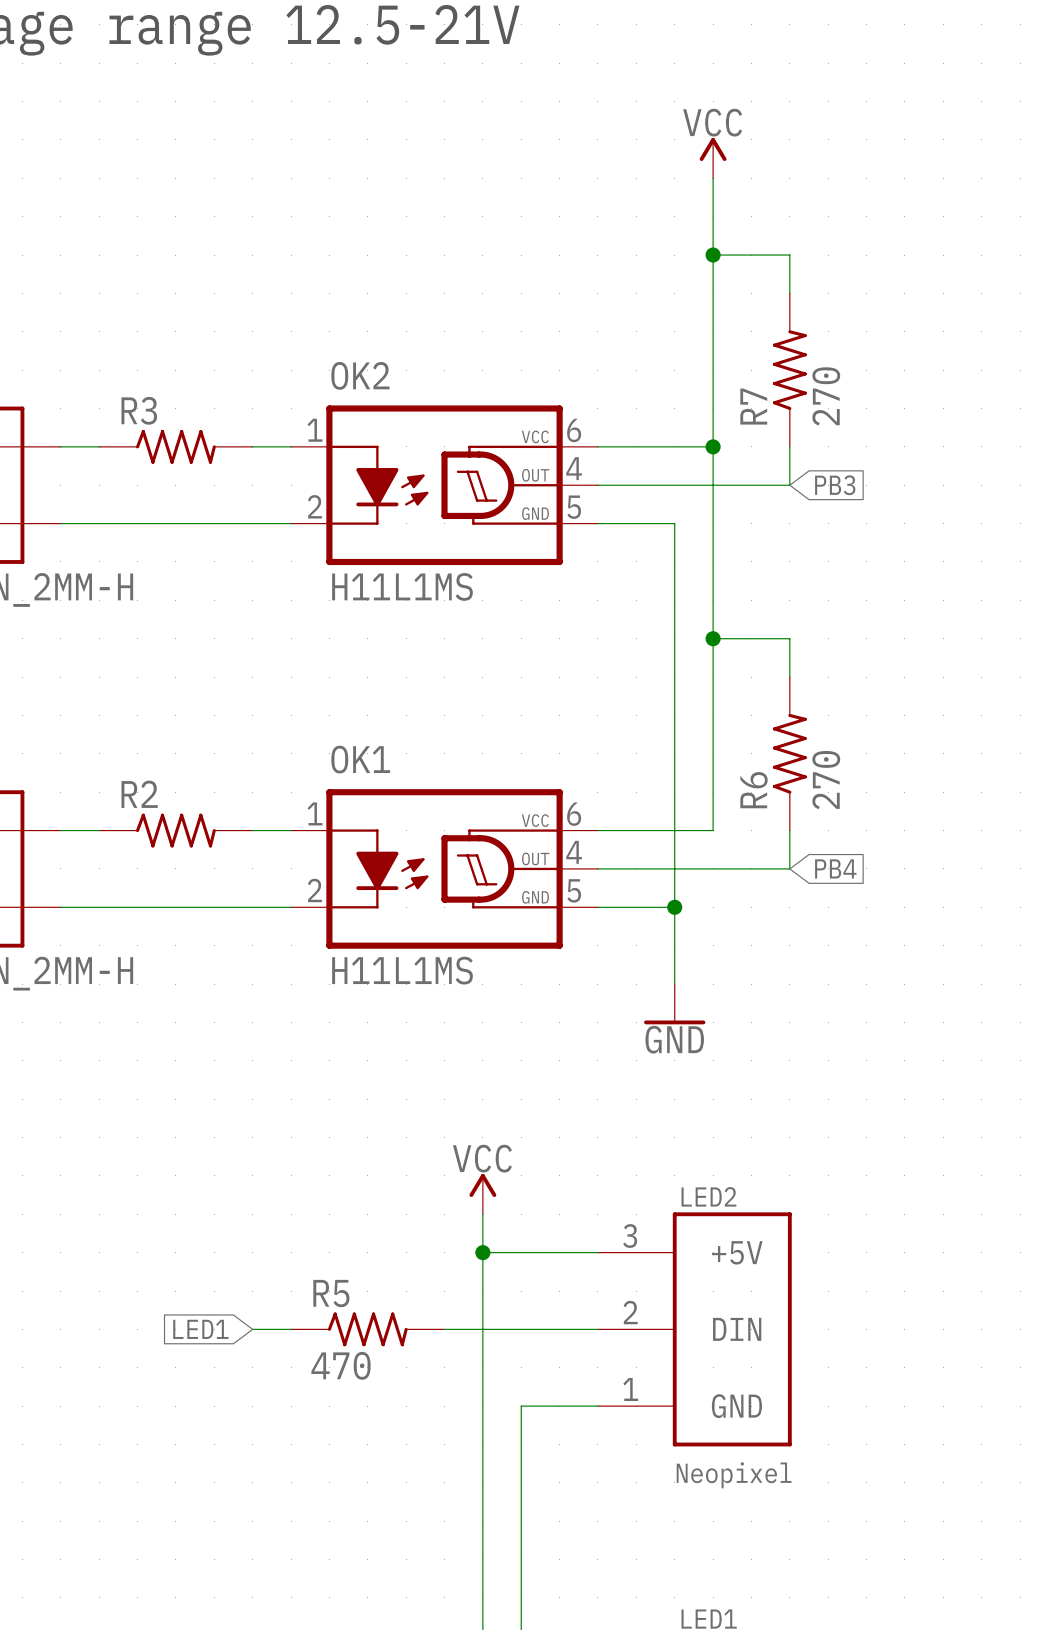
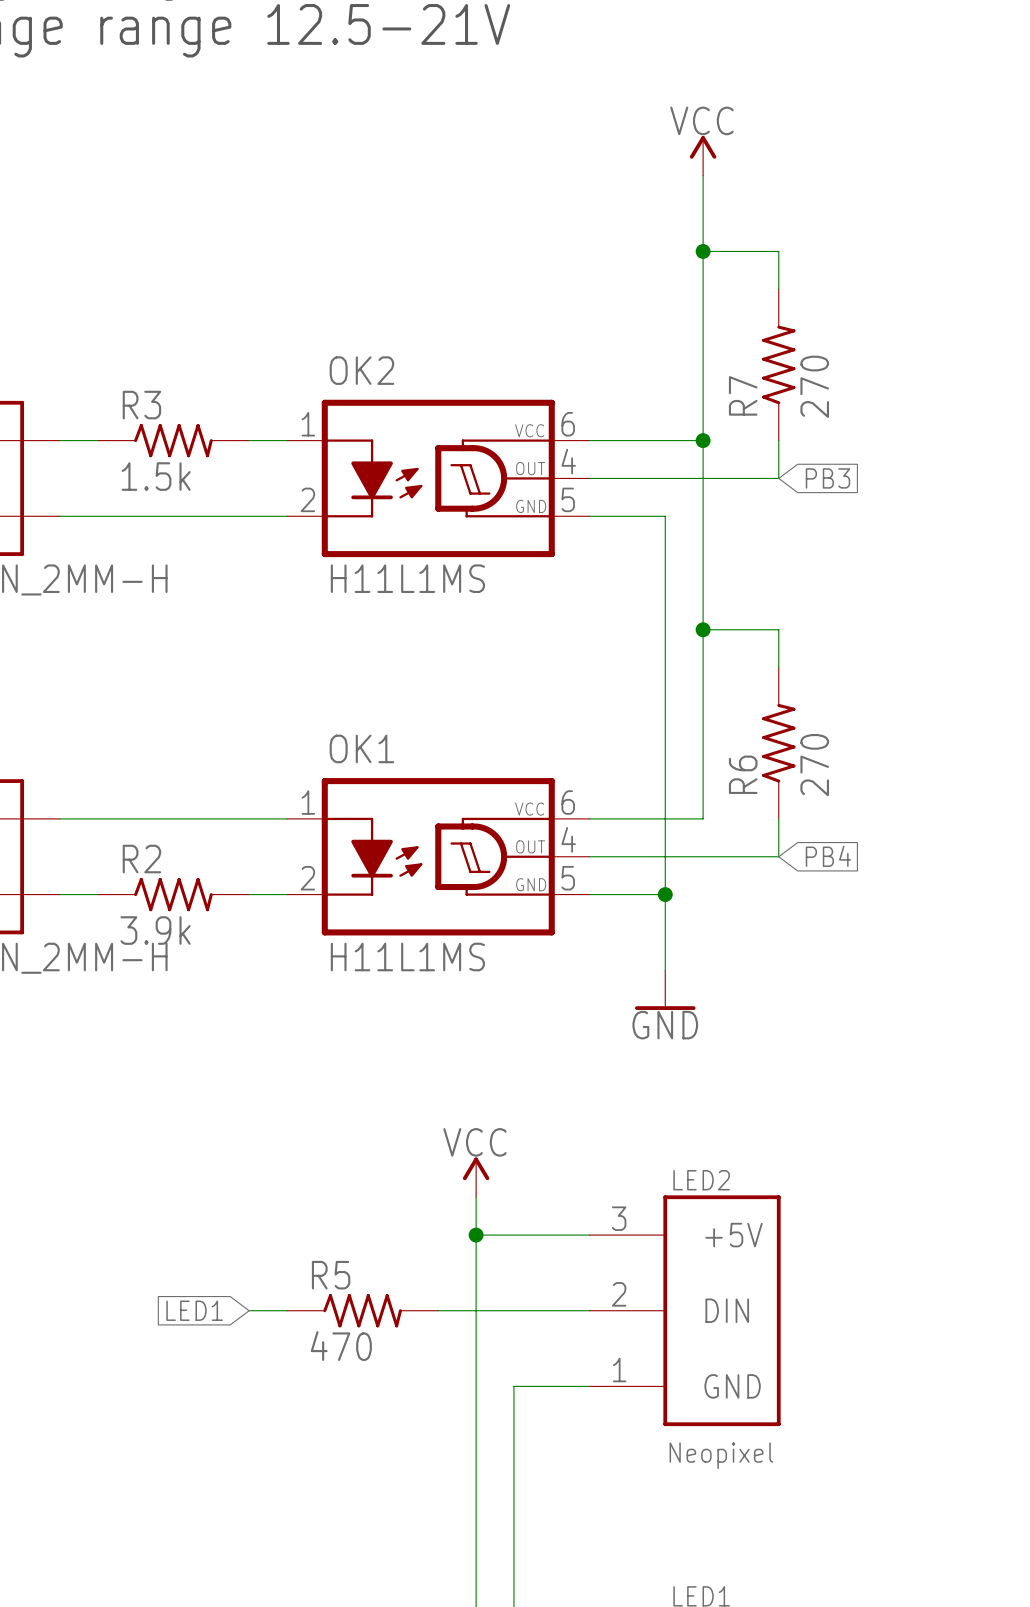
R3 value: none -> 1.5k (156, 476)
R2 position: (175, 830) -> (173, 894)
R2 value: none -> 3.9k (155, 930)

